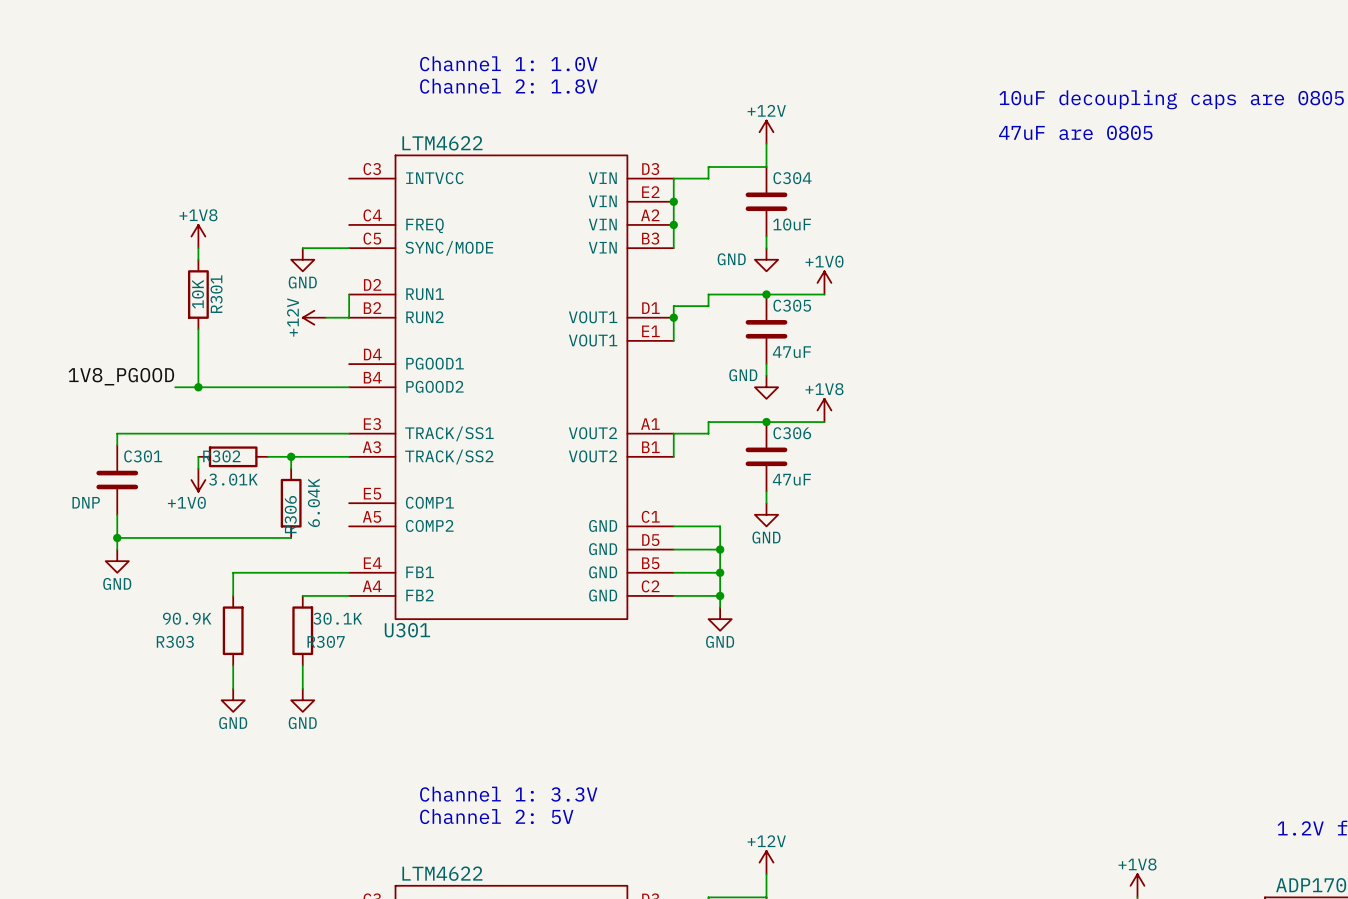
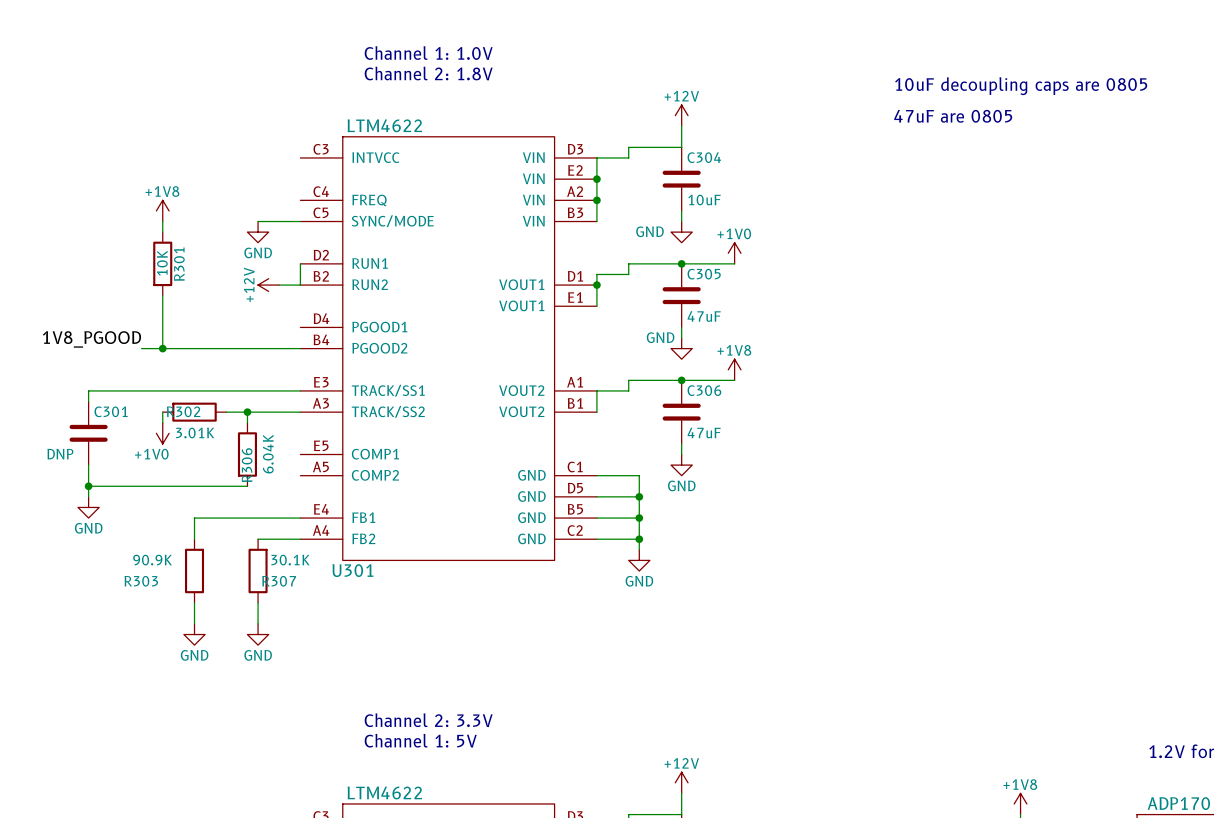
text: Channel 1: 3.3V (508, 794) -> Channel 2: 3.3V (428, 720)
text: Channel 2: 5V (496, 816) -> Channel 1: 5V (420, 740)

